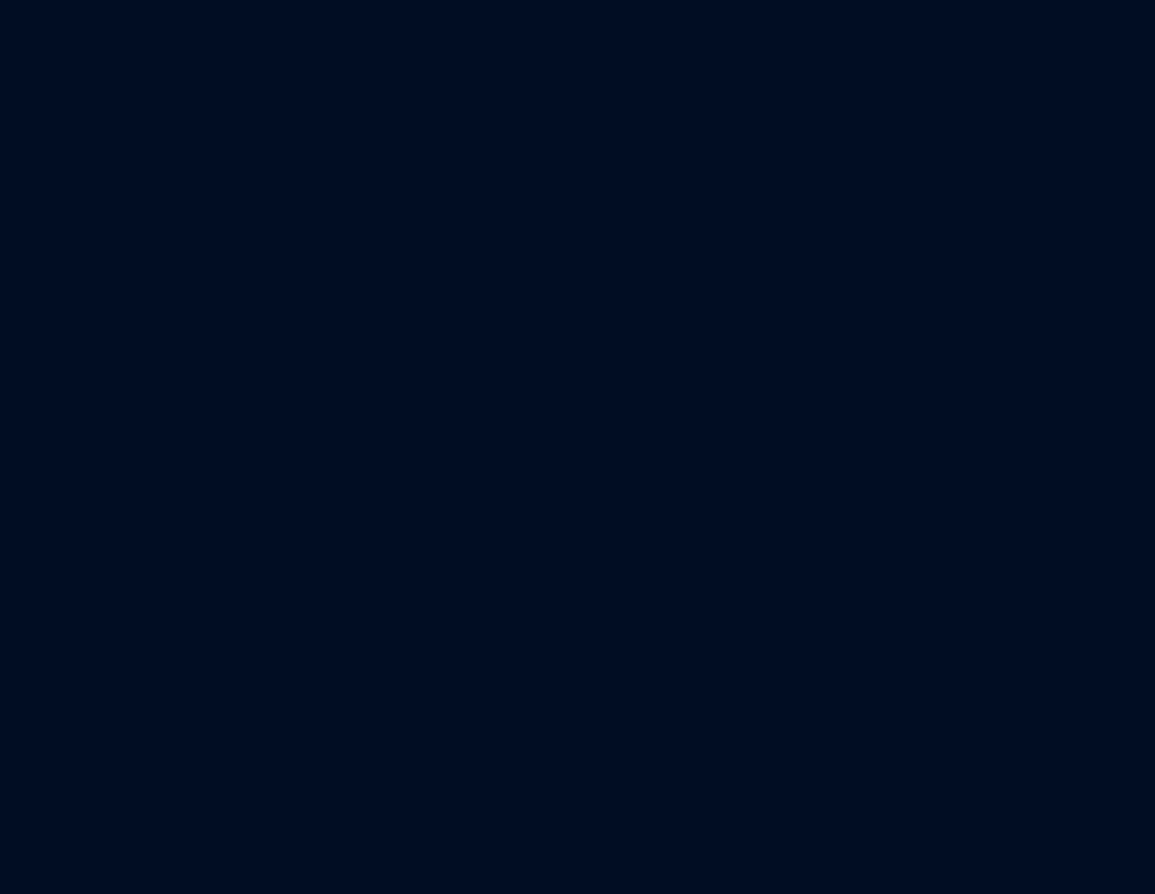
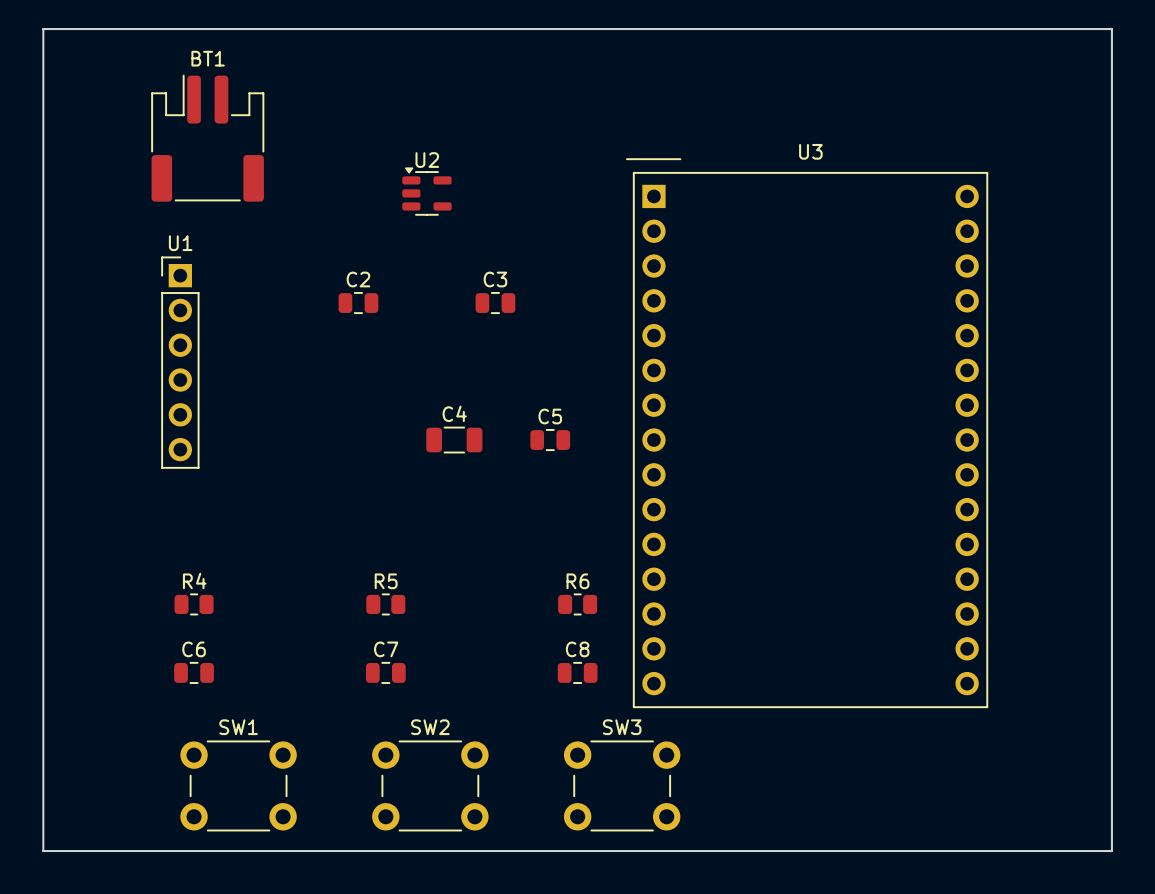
board edge: none -> (43, 29) (1111, 29) (1111, 851) (43, 851) (43, 29)
BT1: none -> (207, 138)
U2: none -> (426, 191)
C2: none -> (358, 303)
C3: none -> (495, 303)
U1: none -> (180, 362)
U3: none -> (807, 433)
C4: none -> (454, 440)
C5: none -> (550, 440)
R4: none -> (194, 604)
R5: none -> (385, 604)
R6: none -> (577, 604)
C6: none -> (194, 672)
C7: none -> (385, 672)
C8: none -> (577, 672)
SW1: none -> (238, 785)
SW2: none -> (430, 785)
SW3: none -> (622, 785)

